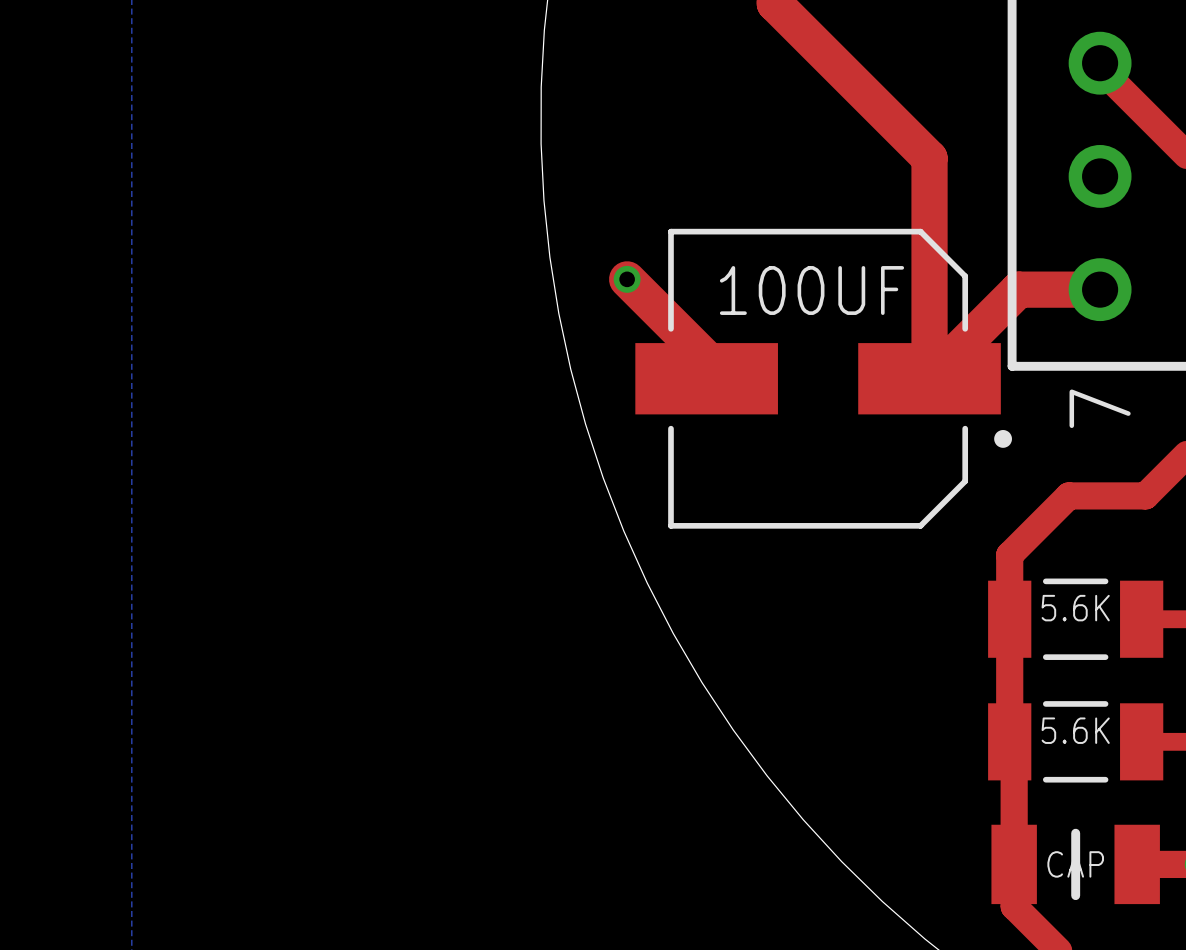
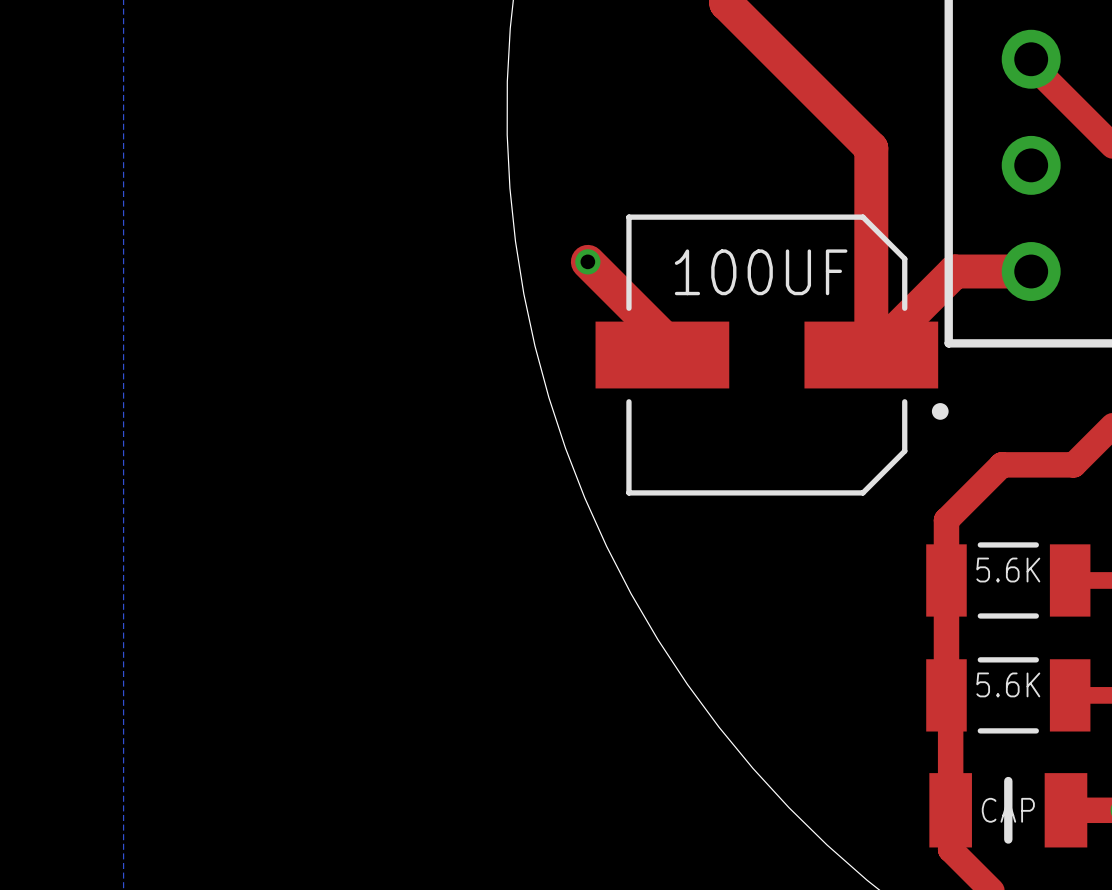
part text: 7 (1100, 408) -> none

